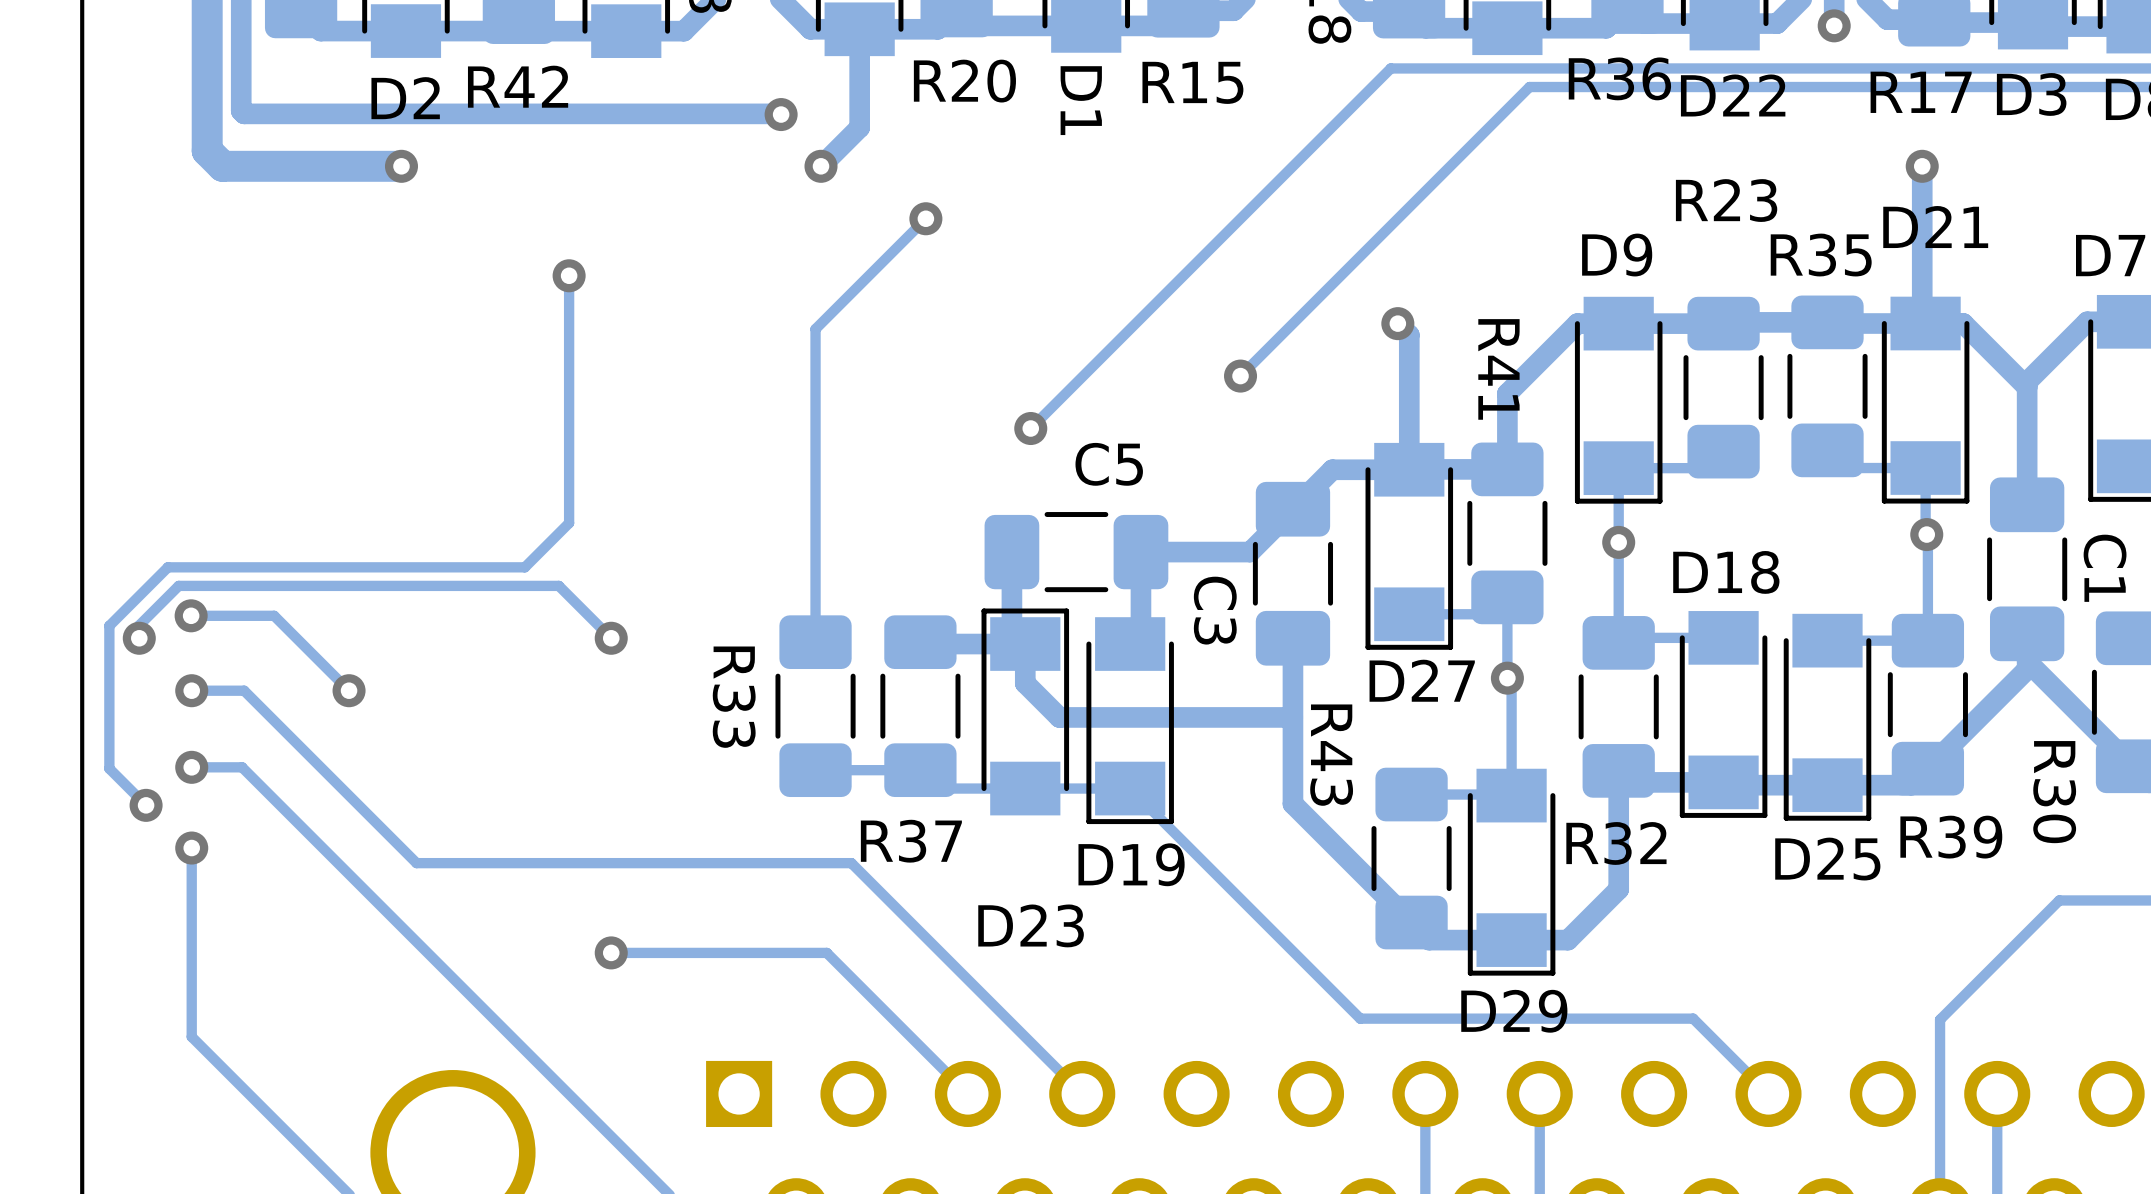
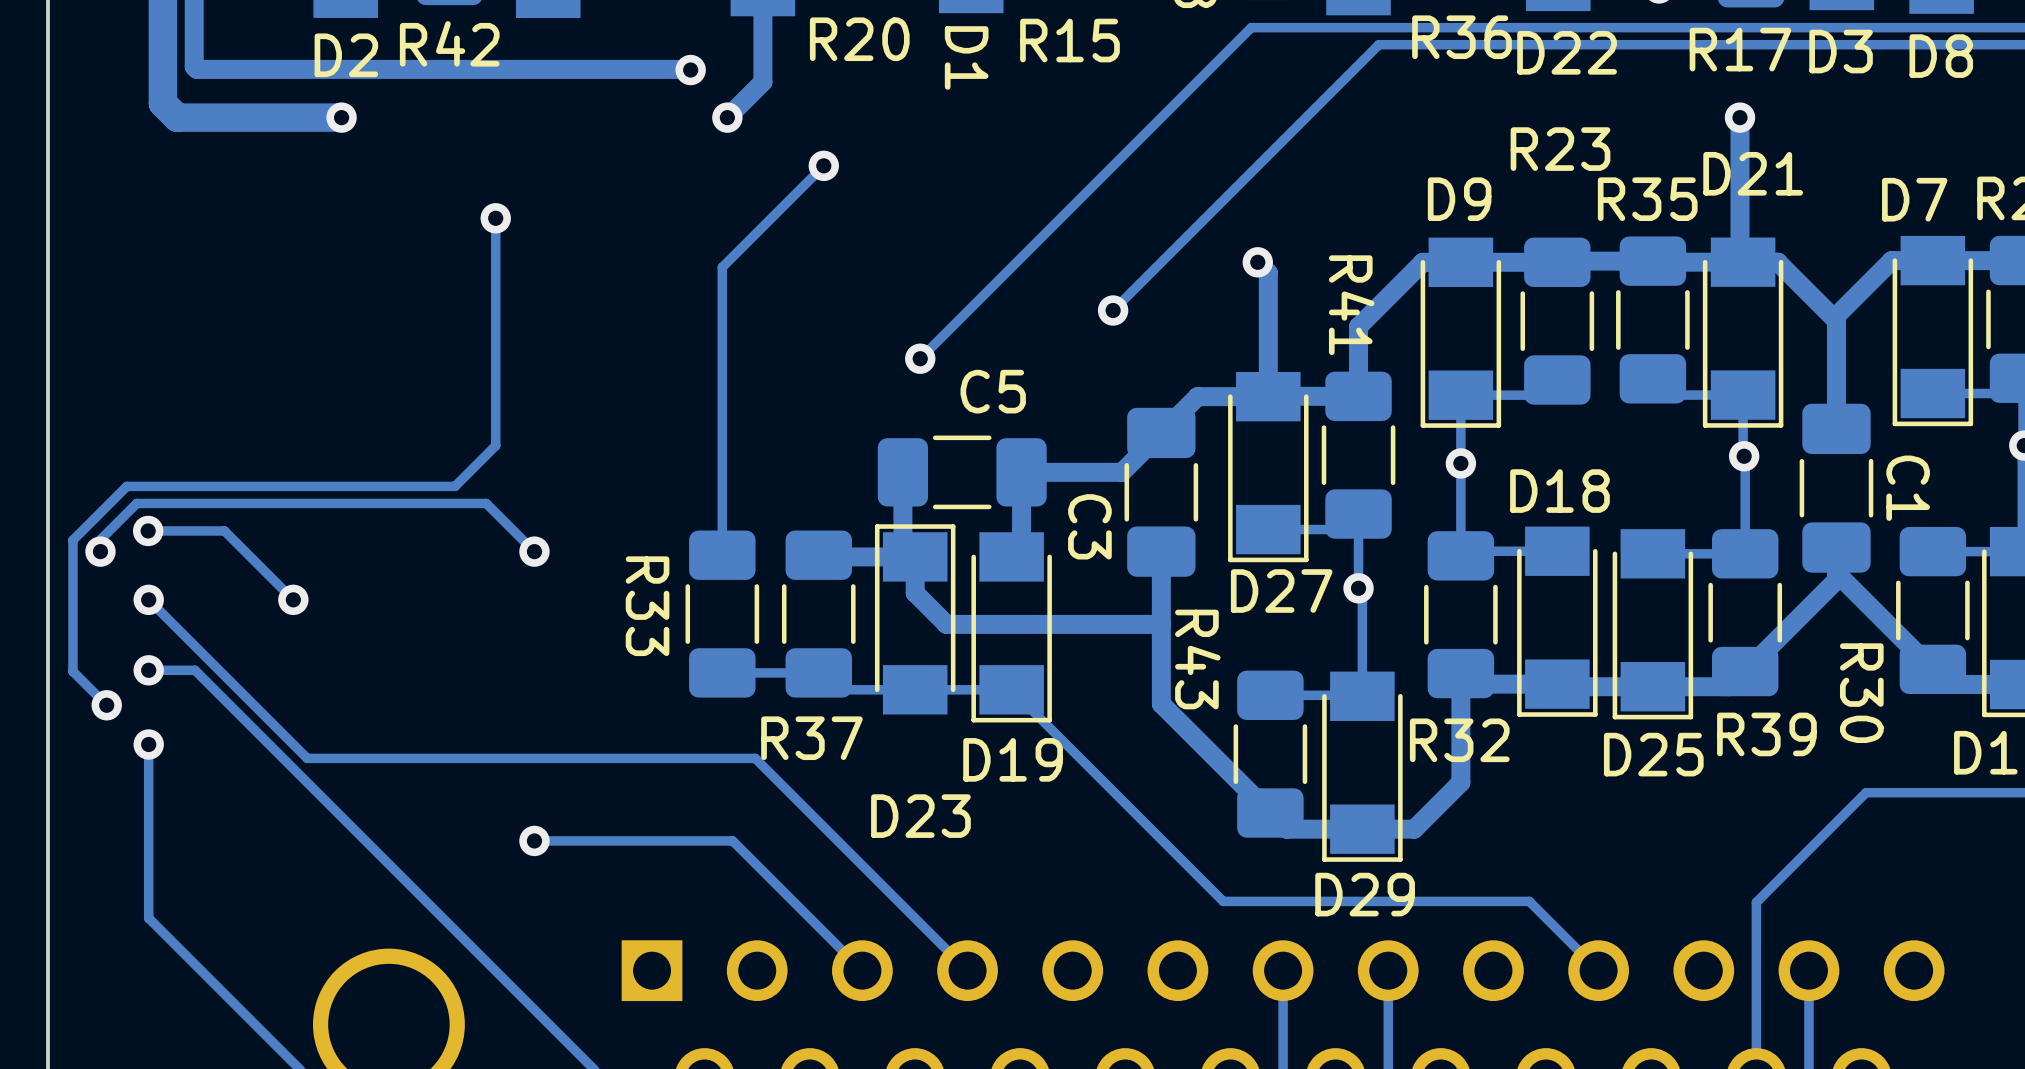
track: (191, 690) (244, 690) (416, 863) -> (148, 599) (307, 758) (355, 758)

